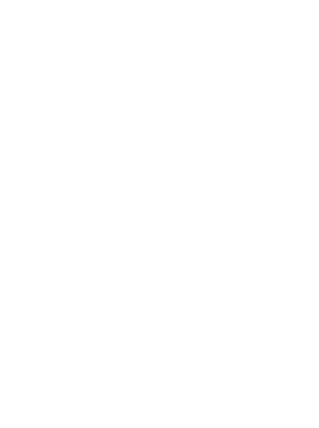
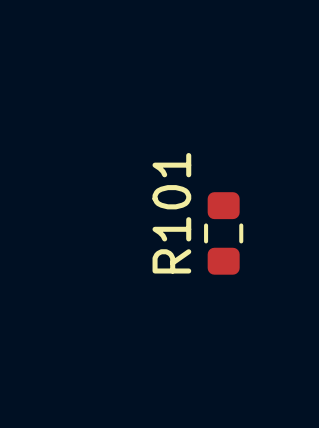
R101: none -> (223, 233)

